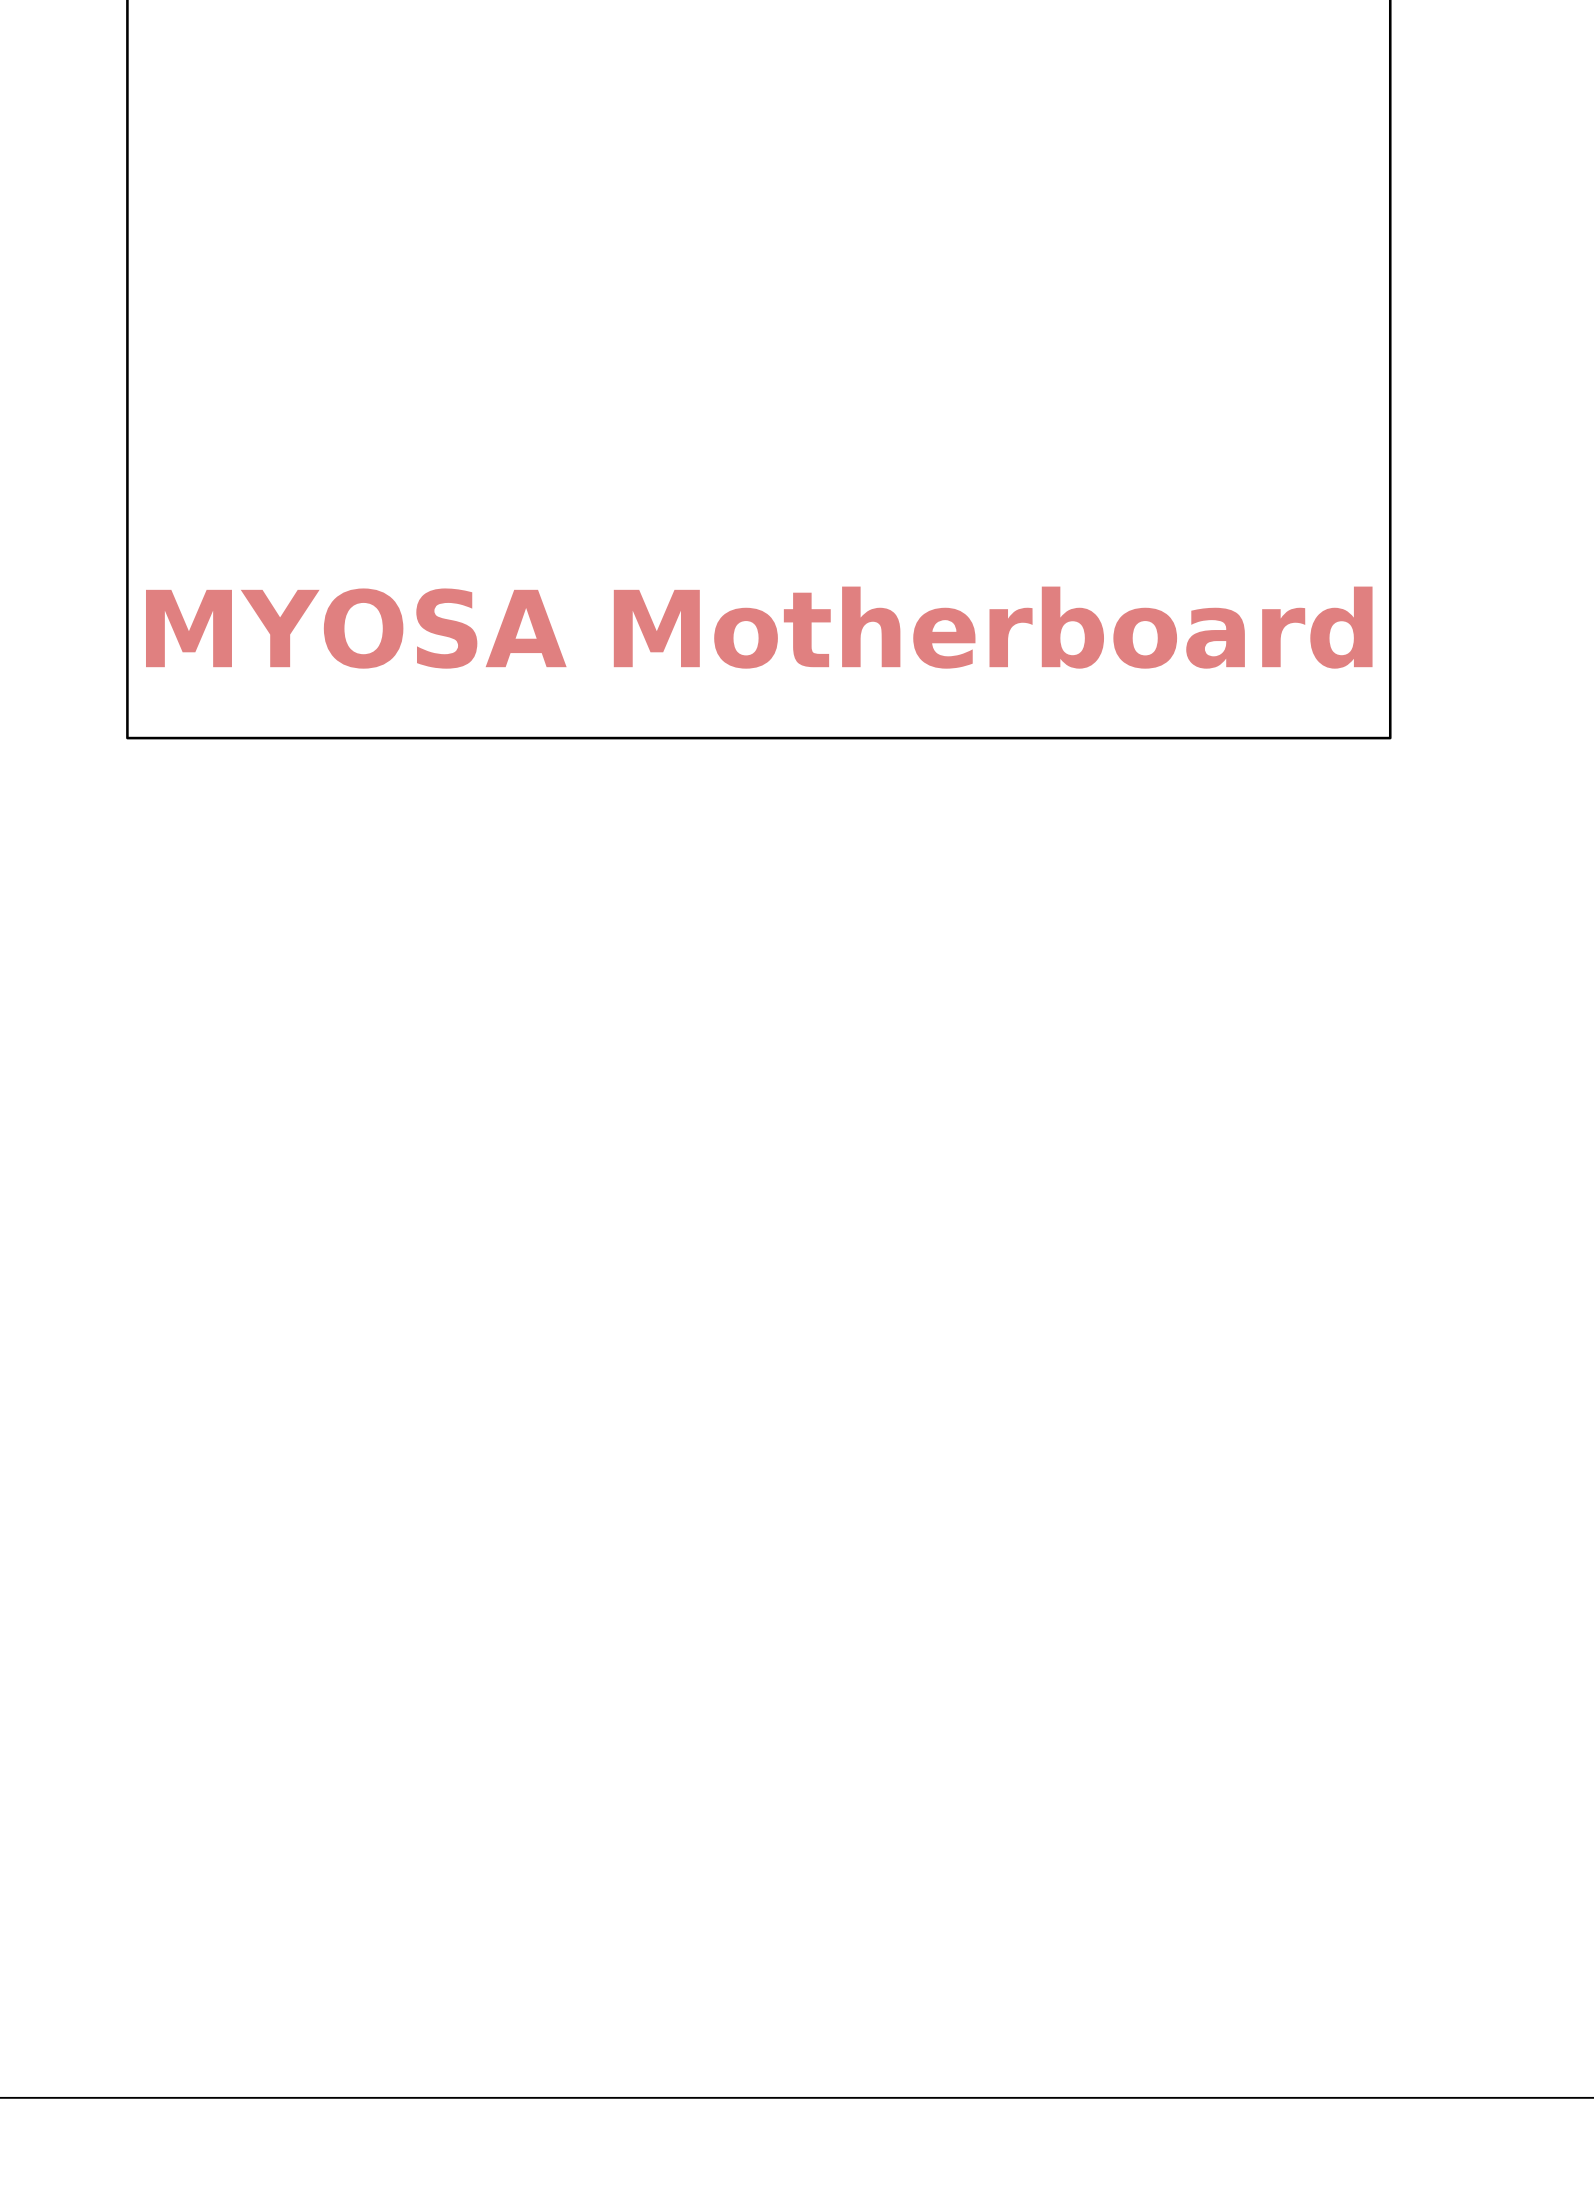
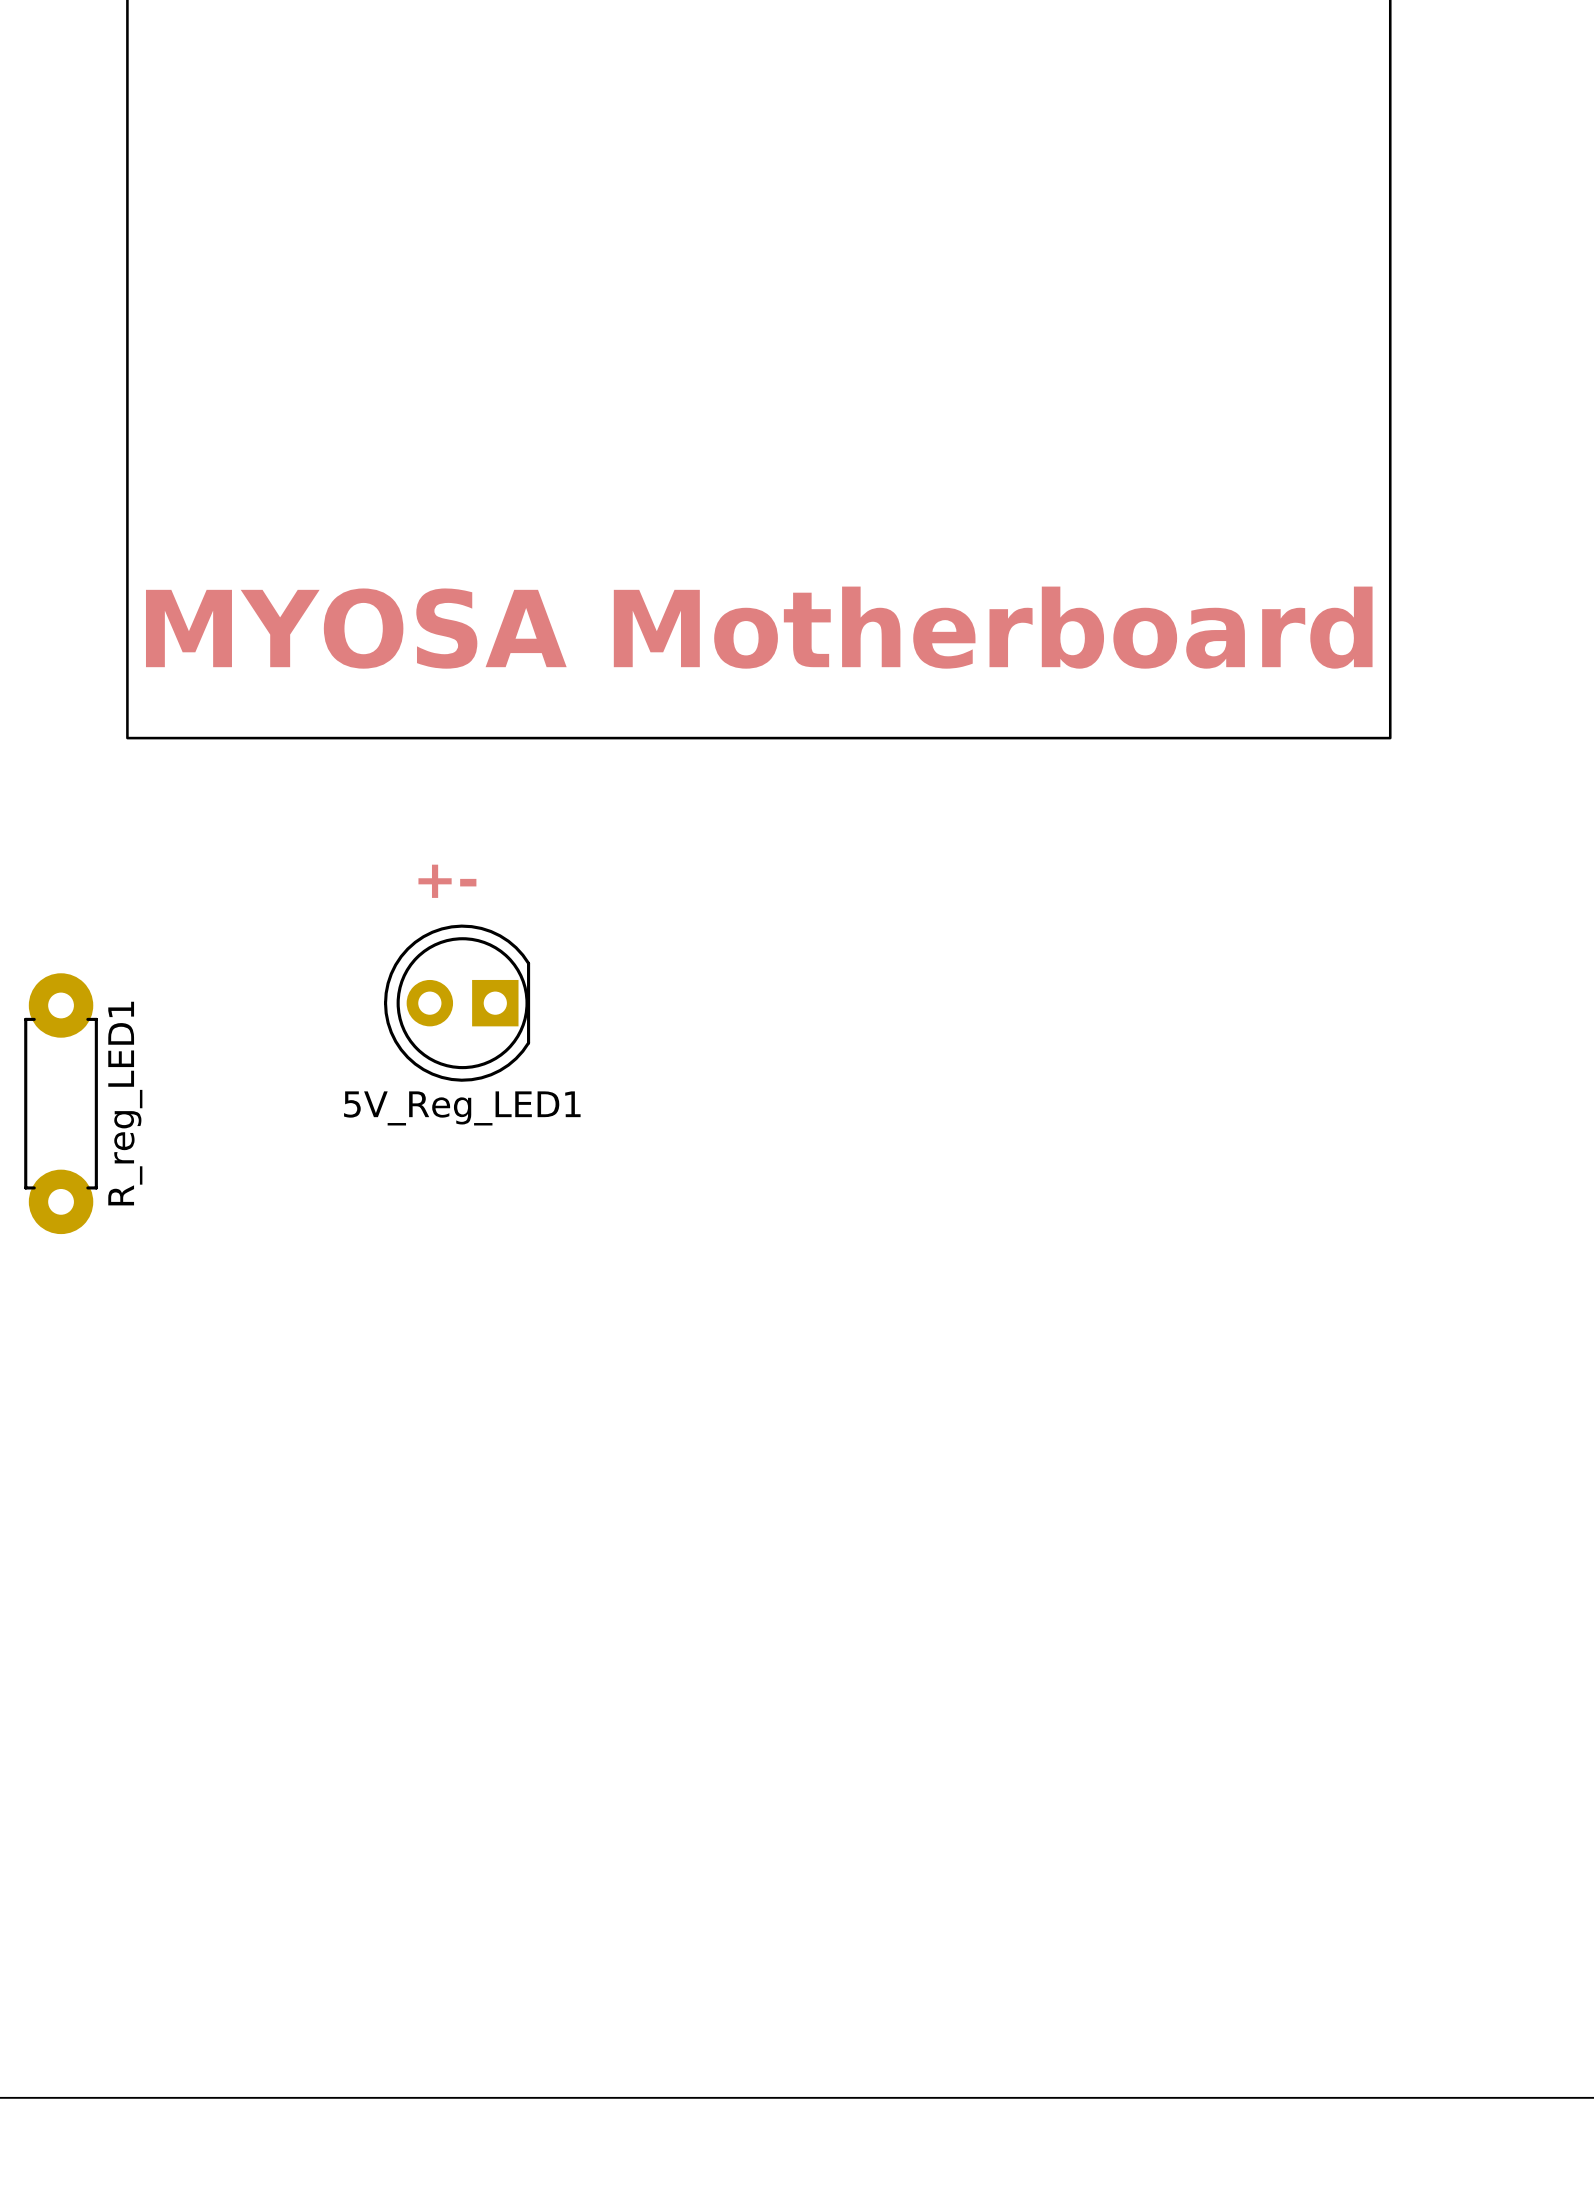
text: none -> +- (447, 881)
5V_Reg_LED1: none -> (457, 1003)
R_reg_LED1: none -> (61, 1103)

